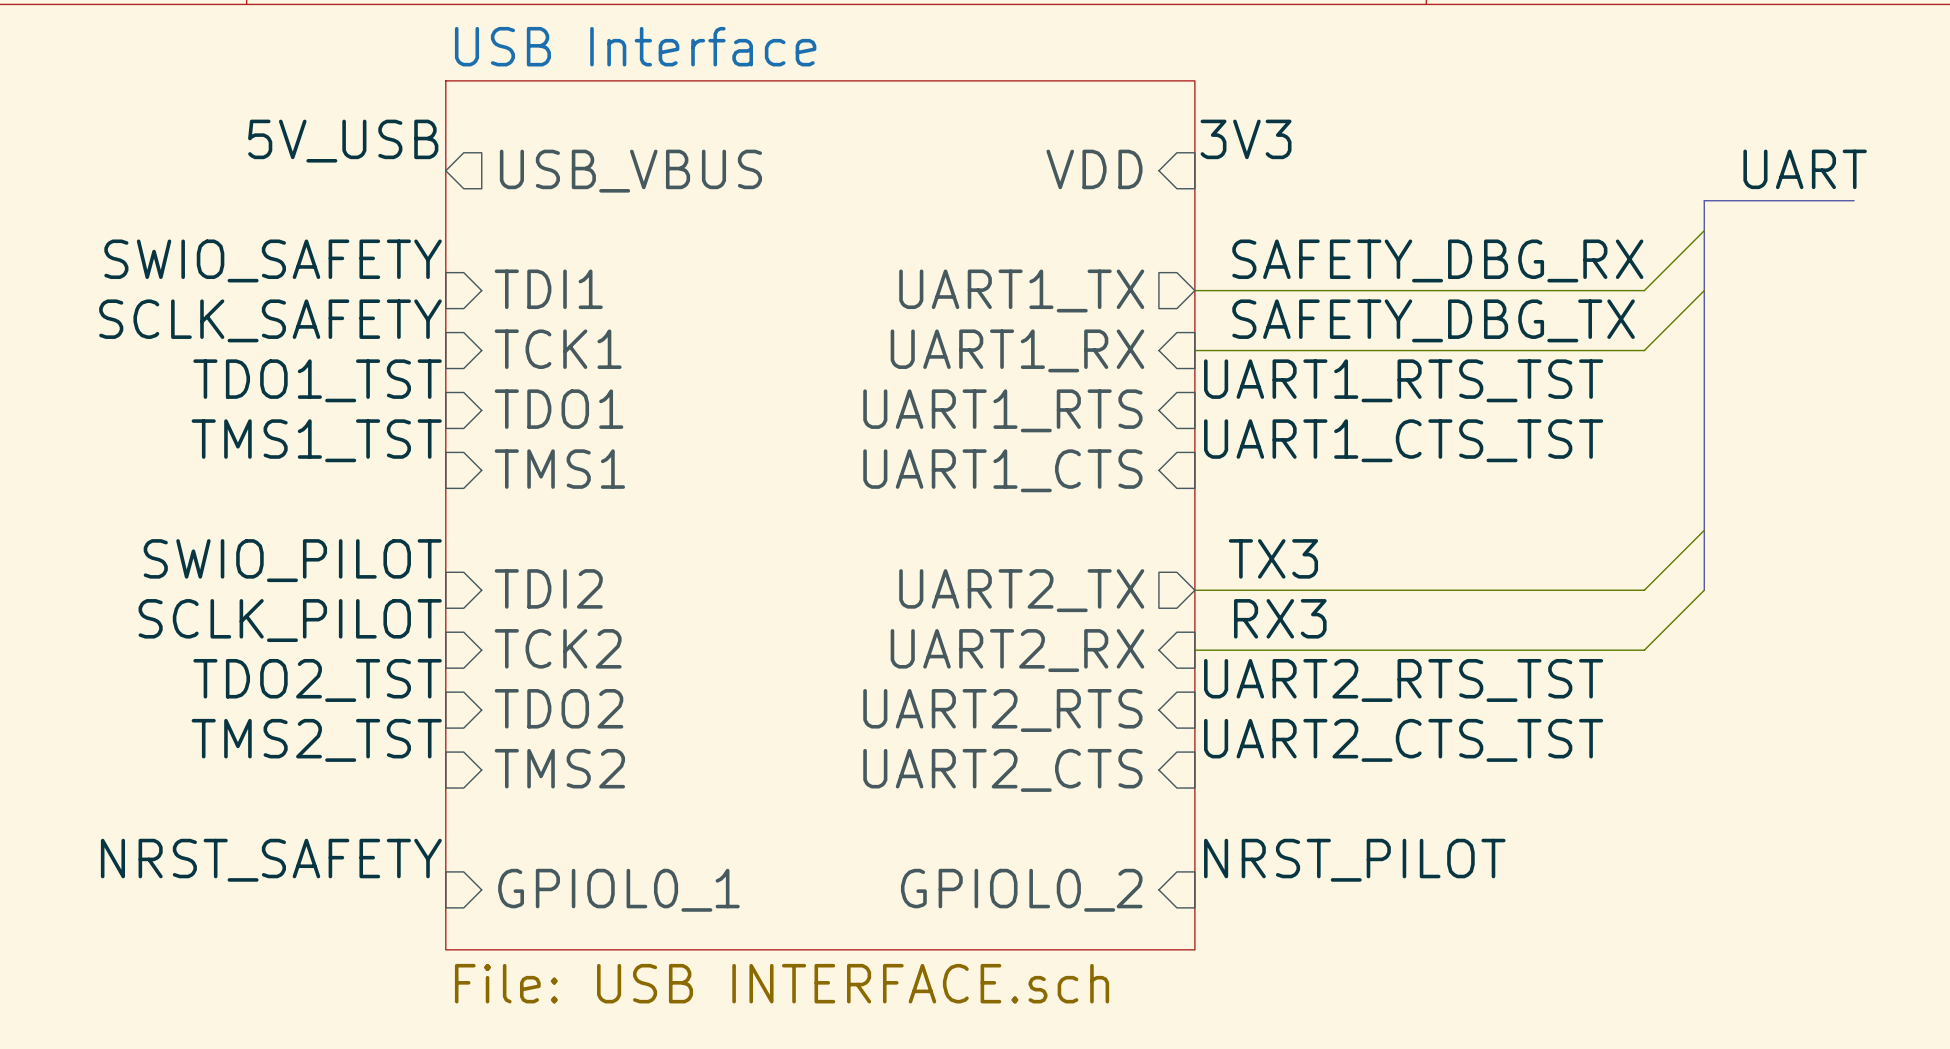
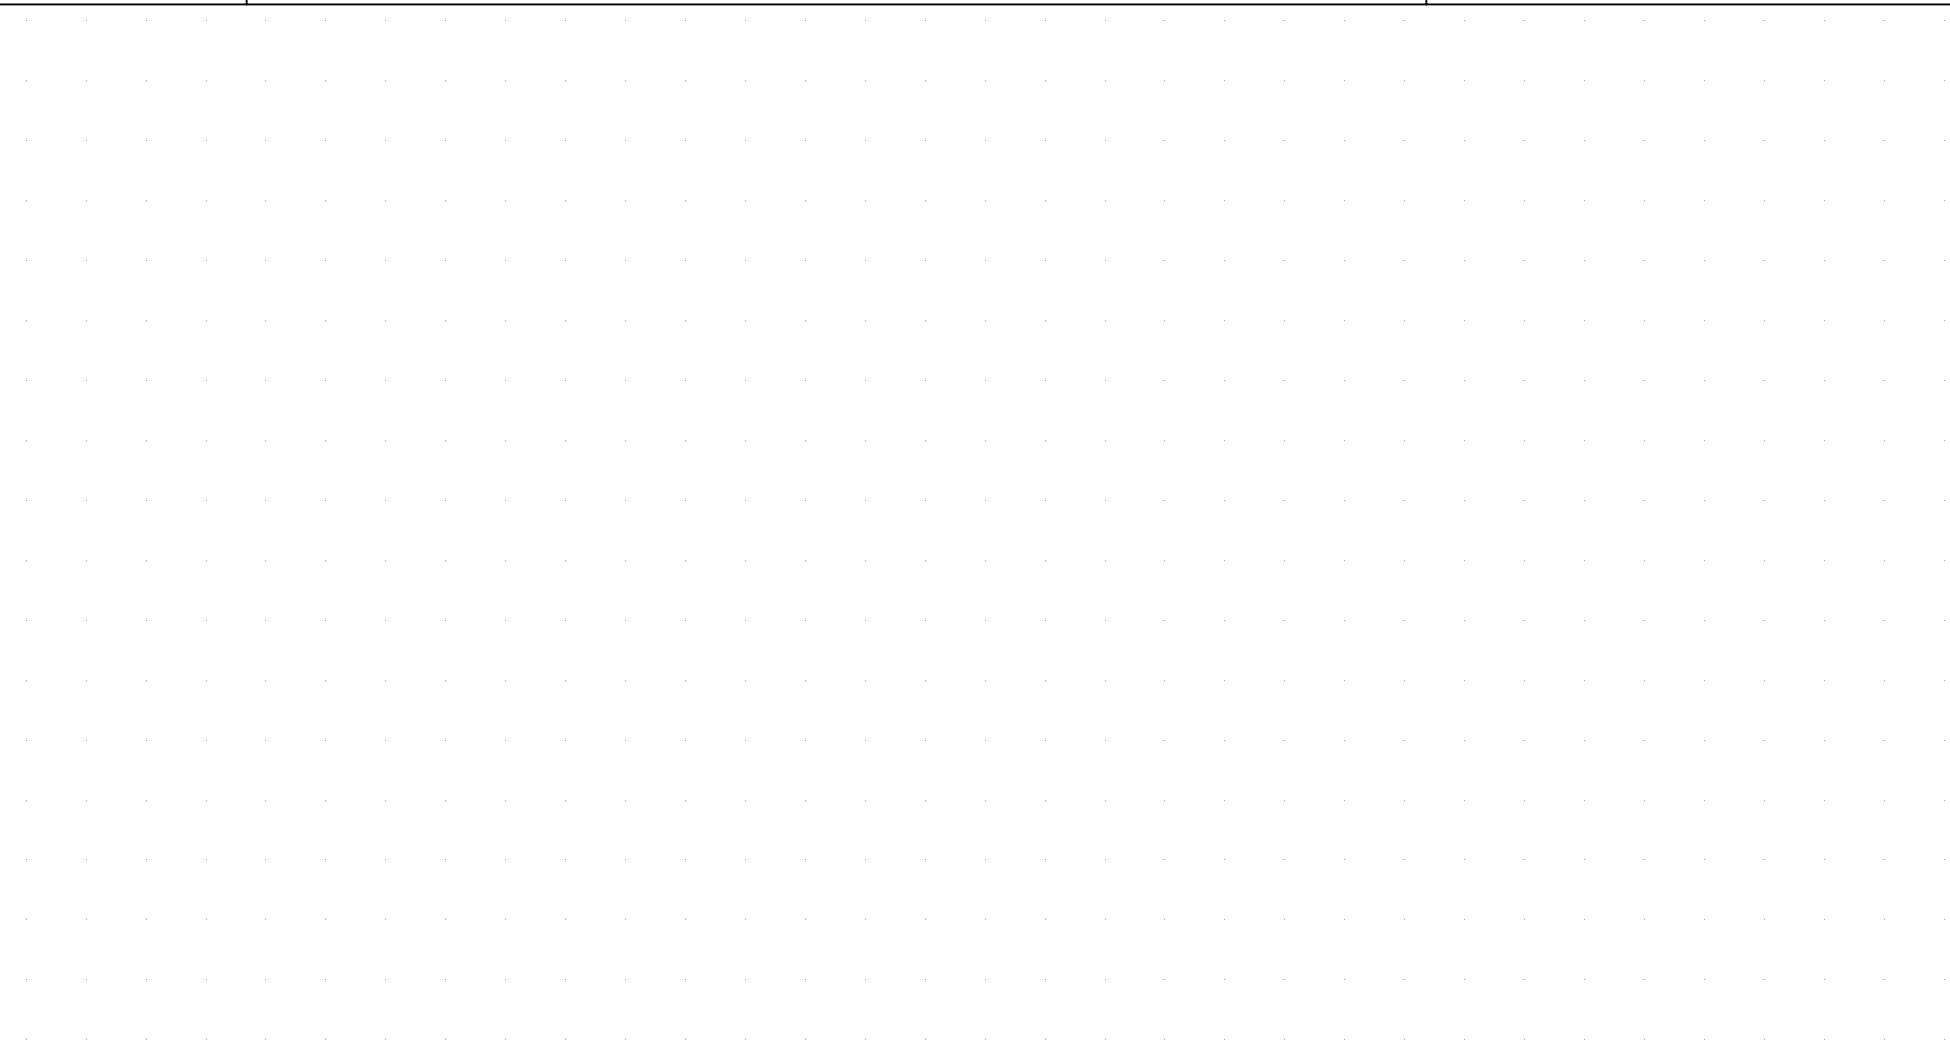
label: 3V3 (1246, 139) -> none
label: 5V_USB (343, 141) -> none
sheet pin: VDD (1094, 169) -> none
label: UART (1805, 169) -> none
sheet pin: USB_VBUS (630, 171) -> none
bus: (1854, 200) (1704, 200) (1704, 590) -> none
wire: (1704, 230) (1644, 290) (1194, 290) -> none
label: SWIO_SAFETY (273, 260) -> none
label: SAFETY_DBG_RX (1437, 260) -> none
sheet pin: TDI1 (548, 289) -> none
sheet pin: UART1_TX (1021, 290) -> none
wire: (1704, 290) (1644, 350) (1194, 350) -> none
label: SCLK_SAFETY (270, 320) -> none
label: SAFETY_DBG_TX (1433, 320) -> none
sheet pin: TCK1 (558, 349) -> none
sheet pin: UART1_RX (1017, 350) -> none
label: TDO1_TST (317, 380) -> none
label: UART1_RTS_TST (1403, 380) -> none
sheet pin: TDO1 (559, 409) -> none
sheet pin: UART1_RTS (1002, 410) -> none
label: TMS1_TST (316, 440) -> none
label: UART1_CTS_TST (1403, 440) -> none
sheet pin: TMS1 (559, 469) -> none
sheet pin: UART1_CTS (1002, 470) -> none
sheet USB Interface: File: USB INTERFACE.sch (820, 515) -> none
wire: (1704, 530) (1644, 590) (1194, 590) -> none
label: TX3 (1273, 558) -> none
label: SWIO_PILOT (292, 560) -> none
sheet pin: TDI2 (548, 588) -> none
sheet pin: UART2_TX (1021, 590) -> none
wire: (1704, 590) (1644, 650) (1194, 650) -> none
label: RX3 (1280, 618) -> none
label: SCLK_PILOT (290, 620) -> none
sheet pin: TCK2 (558, 648) -> none
sheet pin: UART2_RX (1017, 650) -> none
label: TDO2_TST (317, 680) -> none
label: UART2_RTS_TST (1403, 680) -> none
sheet pin: TDO2 (559, 708) -> none
sheet pin: UART2_RTS (1002, 710) -> none
label: TMS2_TST (316, 740) -> none
label: UART2_CTS_TST (1403, 740) -> none
sheet pin: TMS2 (559, 768) -> none
sheet pin: UART2_CTS (1002, 770) -> none
label: NRST_SAFETY (271, 860) -> none
label: NRST_PILOT (1354, 860) -> none
sheet pin: GPIOL0_1 (618, 890) -> none
sheet pin: GPIOL0_2 (1021, 890) -> none

